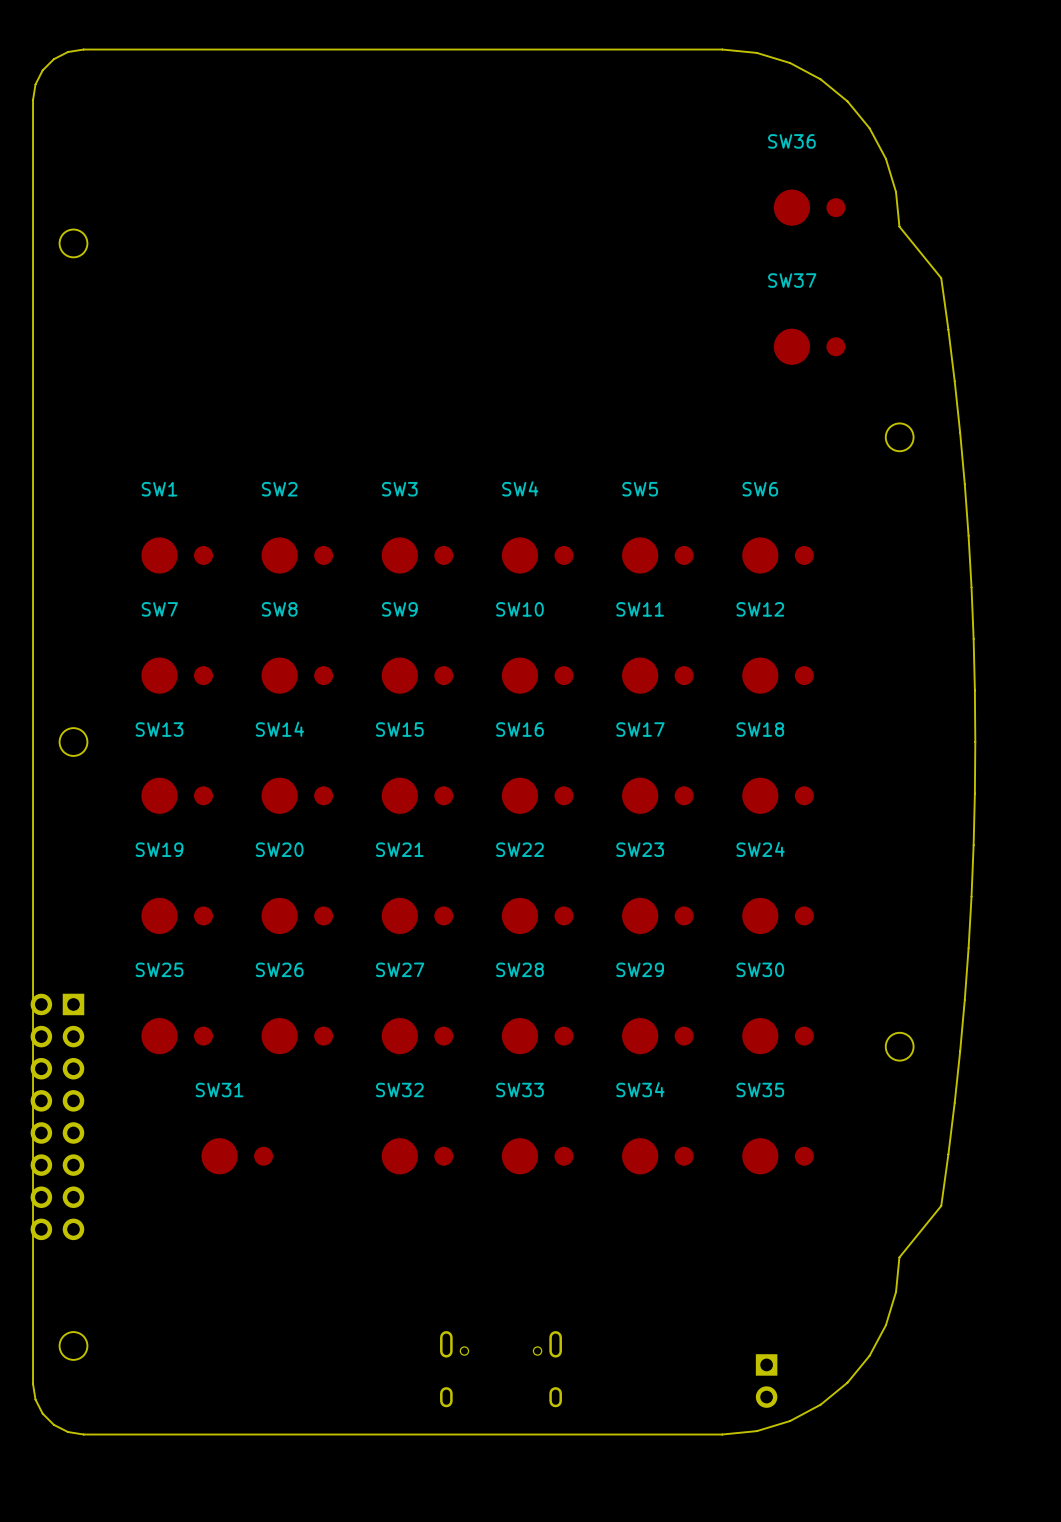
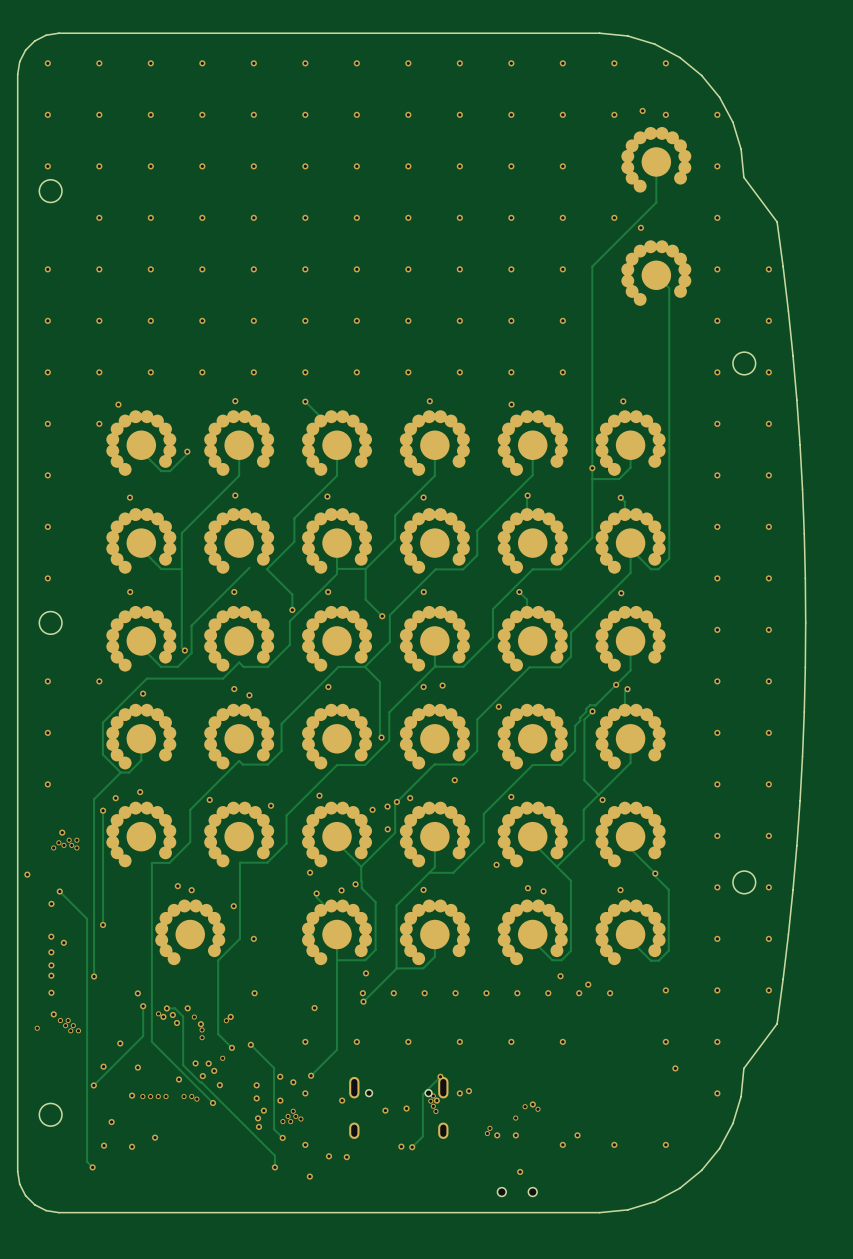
board edge: (722, 49) (756, 52) (790, 63) (820, 79) (847, 101) (869, 128) (885, 158) (896, 192) (899, 226) (941, 278) (948, 329) (964, 484) (973, 638) (974, 793) (968, 948) (960, 1051) (941, 1205) (899, 1257) (896, 1291) (885, 1325) (869, 1355) (847, 1382) (820, 1404) (790, 1421) (756, 1431) (722, 1434) (83, 1434) (67, 1432) (53, 1424) (42, 1413) (35, 1399) (33, 1383) -> (579, 33) (627, 35) (654, 44) (679, 57) (701, 75) (719, 97) (732, 122) (741, 149) (743, 177) (777, 221) (792, 355) (802, 489) (805, 622) (802, 756) (792, 890) (777, 1023) (743, 1068) (741, 1096) (732, 1123) (719, 1148) (701, 1170) (679, 1188) (654, 1201) (627, 1209) (599, 1212) (58, 1212) (46, 1210) (34, 1204) (25, 1195) (19, 1184) (17, 1171) (17, 1119)
via: none -> (47, 63)
via: none -> (99, 63)
via: none -> (150, 63)
via: none -> (202, 63)
via: none -> (253, 63)
via: none -> (305, 63)
via: none -> (356, 63)
via: none -> (408, 63)
via: none -> (459, 63)
via: none -> (511, 63)
via: none -> (562, 63)
via: none -> (614, 63)
via: none -> (665, 63)
via: none -> (642, 110)
via: none -> (47, 114)
via: none -> (99, 114)
via: none -> (150, 114)
via: none -> (202, 114)
via: none -> (253, 114)
via: none -> (305, 114)
via: none -> (356, 114)
via: none -> (408, 114)
via: none -> (459, 114)
via: none -> (511, 114)
via: none -> (562, 114)
via: none -> (614, 114)
via: none -> (665, 114)
via: none -> (717, 114)
part: none -> (656, 159)
SW36: (809, 207) -> none
track: none -> (656, 161) (656, 202) (592, 266) (592, 537) (560, 569) (532, 569) (493, 609) (493, 637) (463, 666) (436, 666) (434, 640)
via: none -> (47, 166)
via: none -> (99, 166)
via: none -> (150, 166)
via: none -> (202, 166)
via: none -> (253, 166)
via: none -> (305, 166)
via: none -> (356, 166)
via: none -> (408, 166)
via: none -> (459, 166)
via: none -> (511, 166)
via: none -> (562, 166)
via: none -> (717, 166)
via: none -> (99, 217)
via: none -> (150, 217)
via: none -> (202, 217)
via: none -> (253, 217)
via: none -> (305, 217)
via: none -> (356, 217)
via: none -> (408, 217)
via: none -> (459, 217)
via: none -> (511, 217)
via: none -> (562, 217)
via: none -> (614, 217)
via: none -> (717, 217)
via: none -> (640, 227)
via: none -> (47, 269)
via: none -> (99, 269)
via: none -> (150, 269)
via: none -> (202, 269)
via: none -> (253, 269)
via: none -> (305, 269)
via: none -> (356, 269)
via: none -> (408, 269)
via: none -> (459, 269)
via: none -> (511, 269)
via: none -> (562, 269)
via: none -> (717, 269)
via: none -> (768, 269)
part: none -> (656, 273)
SW37: (809, 346) -> none
track: none -> (656, 275) (669, 288) (669, 558) (658, 569) (650, 569) (630, 548)
via: none -> (47, 320)
via: none -> (99, 320)
via: none -> (150, 320)
via: none -> (202, 320)
via: none -> (253, 320)
via: none -> (305, 320)
via: none -> (356, 320)
via: none -> (408, 320)
via: none -> (459, 320)
via: none -> (511, 320)
via: none -> (562, 320)
via: none -> (717, 320)
via: none -> (768, 320)
round board edge position: (899, 437) -> (744, 363)
via: none -> (47, 372)
via: none -> (99, 372)
via: none -> (150, 372)
via: none -> (202, 372)
via: none -> (253, 372)
via: none -> (305, 372)
via: none -> (356, 372)
via: none -> (408, 372)
via: none -> (459, 372)
via: none -> (511, 372)
via: none -> (562, 372)
via: none -> (717, 372)
via: none -> (768, 372)
via: none -> (235, 401)
track: none -> (305, 401) (320, 417)
via: none -> (305, 401)
via: none -> (429, 401)
via: none -> (623, 401)
via: none -> (118, 404)
via: none -> (511, 404)
via: none -> (47, 423)
via: none -> (99, 423)
via: none -> (717, 423)
via: none -> (768, 423)
part: none -> (141, 443)
part: none -> (239, 443)
part: none -> (337, 443)
part: none -> (434, 443)
part: none -> (532, 443)
part: none -> (630, 443)
SW1: (177, 555) -> none
track: none -> (141, 445) (141, 451) (161, 471) (170, 471) (187, 451)
SW2: (297, 555) -> none
track: none -> (239, 445) (239, 475) (181, 533) (181, 647) (184, 650)
SW3: (417, 555) -> none
track: none -> (337, 445) (337, 475) (294, 518) (294, 541) (266, 569) (292, 594) (292, 609)
SW4: (537, 555) -> none
track: none -> (434, 445) (434, 475) (395, 515) (395, 539) (365, 568)
SW5: (657, 555) -> none
track: none -> (532, 445) (532, 475) (477, 530) (477, 555) (463, 569) (435, 569) (389, 615) (389, 642) (364, 666)
SW6: (777, 555) -> none
track: none -> (630, 445) (630, 467) (619, 479) (592, 479)
via: none -> (187, 451)
via: none -> (592, 468)
via: none -> (47, 475)
via: none -> (717, 475)
via: none -> (768, 475)
via: none -> (235, 495)
track: none -> (527, 495) (527, 514)
via: none -> (527, 495)
via: none -> (327, 496)
via: none -> (129, 497)
via: none -> (423, 497)
track: none -> (620, 497) (624, 501) (624, 514)
via: none -> (620, 497)
via: none -> (47, 526)
via: none -> (717, 526)
via: none -> (768, 526)
part: none -> (141, 540)
part: none -> (239, 540)
part: none -> (337, 540)
part: none -> (434, 540)
part: none -> (532, 540)
part: none -> (630, 540)
SW7: (177, 675) -> none
track: none -> (141, 543) (141, 548) (161, 569) (181, 569)
SW8: (297, 675) -> none
SW9: (417, 675) -> none
track: none -> (337, 543) (337, 574) (289, 621) (289, 644) (267, 666) (243, 666) (239, 662) (223, 678) (146, 678) (102, 722) (102, 754) (120, 772)
SW10: (537, 675) -> none
SW11: (657, 675) -> none
SW12: (777, 675) -> none
track: none -> (630, 543) (630, 573) (571, 632) (571, 656) (560, 667) (529, 667) (477, 719) (477, 750) (463, 764) (434, 764) (395, 803) (395, 832) (361, 866)
track: none -> (249, 567) (191, 625) (191, 653) (177, 666) (161, 666) (141, 647) (141, 640)
track: none -> (337, 568) (365, 568)
track: none -> (365, 568) (365, 599) (382, 616)
via: none -> (47, 578)
via: none -> (717, 578)
via: none -> (768, 578)
via: none -> (130, 592)
via: none -> (234, 592)
via: none -> (328, 592)
via: none -> (423, 592)
track: none -> (519, 592) (527, 599) (527, 612)
via: none -> (519, 592)
via: none -> (621, 593)
round board edge position: (73, 742) -> (50, 622)
via: none -> (292, 609)
via: none -> (382, 616)
via: none -> (717, 629)
via: none -> (768, 629)
part: none -> (141, 638)
part: none -> (239, 638)
part: none -> (337, 638)
part: none -> (434, 638)
part: none -> (532, 638)
part: none -> (630, 638)
SW13: (177, 795) -> none
SW14: (297, 795) -> none
SW15: (417, 795) -> none
SW16: (537, 795) -> none
SW17: (657, 795) -> none
SW18: (777, 795) -> none
track: none -> (630, 640) (630, 670) (595, 705) (589, 705) (586, 708) (586, 711) (575, 725) (575, 750) (561, 765) (532, 765) (483, 813) (483, 842) (453, 872) (429, 872)
via: none -> (184, 650)
track: none -> (435, 666) (389, 712) (389, 740) (365, 765) (337, 765) (286, 815) (286, 843) (267, 862) (239, 862) (239, 938) (218, 960) (218, 1034) (231, 1047)
track: none -> (364, 666) (338, 666) (281, 723) (281, 750) (267, 764) (242, 764) (239, 760) (190, 809) (190, 842) (169, 862) (151, 862) (151, 1041) (213, 1102)
track: none -> (364, 666) (379, 681) (379, 735) (381, 737)
via: none -> (47, 681)
via: none -> (99, 681)
via: none -> (717, 681)
via: none -> (768, 681)
via: none -> (616, 684)
via: none -> (442, 685)
via: none -> (328, 686)
via: none -> (423, 686)
via: none -> (234, 689)
track: none -> (627, 689) (624, 691) (624, 710)
via: none -> (627, 689)
via: none -> (143, 693)
via: none -> (249, 695)
via: none -> (498, 706)
track: none -> (592, 711) (584, 719) (584, 780) (598, 794)
via: none -> (592, 711)
via: none -> (47, 732)
via: none -> (717, 732)
via: none -> (768, 732)
part: none -> (141, 736)
part: none -> (239, 736)
part: none -> (337, 736)
part: none -> (434, 736)
part: none -> (532, 736)
part: none -> (630, 736)
via: none -> (381, 737)
SW19: (177, 915) -> none
track: none -> (141, 738) (141, 760) (129, 772) (120, 772)
SW20: (297, 915) -> none
SW21: (417, 915) -> none
SW22: (537, 915) -> none
SW23: (657, 915) -> none
SW24: (777, 915) -> none
track: none -> (630, 738) (630, 762) (583, 809) (583, 839) (556, 866)
track: none -> (120, 772) (94, 799) (94, 976)
via: none -> (454, 780)
via: none -> (47, 784)
via: none -> (717, 784)
via: none -> (768, 784)
via: none -> (140, 792)
via: none -> (319, 795)
via: none -> (511, 797)
via: none -> (115, 798)
via: none -> (410, 798)
via: none -> (209, 799)
via: none -> (602, 799)
via: none -> (396, 801)
via: none -> (270, 805)
via: none -> (387, 806)
via: none -> (372, 809)
track: none -> (103, 810) (103, 924)
via: none -> (103, 810)
via: none -> (387, 829)
via: none -> (62, 832)
part: none -> (141, 834)
part: none -> (239, 834)
part: none -> (337, 834)
part: none -> (434, 834)
part: none -> (532, 834)
part: none -> (630, 834)
via: none -> (717, 835)
via: none -> (768, 835)
SW25: (177, 1036) -> none
SW26: (297, 1036) -> none
SW27: (417, 1036) -> none
track: none -> (337, 836) (337, 842) (361, 866)
SW28: (537, 1036) -> none
track: none -> (434, 836) (434, 867) (396, 905) (396, 968) (363, 1001)
SW29: (657, 1036) -> none
track: none -> (532, 836) (532, 842) (570, 880) (570, 950) (561, 960) (552, 960) (532, 940) (532, 934)
SW30: (777, 1036) -> none
track: none -> (630, 836) (630, 848) (668, 889) (668, 950) (658, 960) (650, 960) (630, 940) (630, 934)
via: none -> (69, 840)
via: none -> (76, 840)
via: none -> (58, 842)
via: none -> (64, 845)
via: none -> (71, 845)
round board edge position: (899, 1046) -> (744, 882)
via: none -> (53, 847)
via: none -> (76, 847)
via: none -> (496, 864)
track: none -> (361, 866) (361, 888) (375, 902) (375, 949) (365, 960) (337, 960)
via: none -> (310, 872)
via: none -> (655, 873)
via: none -> (27, 874)
via: none -> (355, 884)
via: none -> (177, 886)
via: none -> (717, 887)
via: none -> (768, 887)
via: none -> (527, 888)
via: none -> (191, 890)
via: none -> (423, 889)
via: none -> (620, 890)
via: none -> (341, 890)
track: none -> (59, 891) (87, 918) (87, 1161) (92, 1167)
via: none -> (59, 891)
via: none -> (543, 891)
track: none -> (316, 893) (316, 897) (325, 905)
via: none -> (316, 893)
part: (57, 1116) -> none
via: none -> (51, 903)
via: none -> (233, 906)
via: none -> (103, 924)
part: none -> (190, 932)
part: none -> (337, 932)
part: none -> (434, 932)
part: none -> (532, 932)
part: none -> (630, 932)
SW31: (237, 1156) -> none
SW32: (417, 1156) -> none
track: none -> (337, 934) (337, 1049) (311, 1075)
SW33: (537, 1156) -> none
track: none -> (434, 934) (434, 956) (423, 968) (396, 968)
SW34: (657, 1156) -> none
SW35: (777, 1156) -> none
via: none -> (51, 936)
via: none -> (253, 938)
via: none -> (717, 938)
via: none -> (768, 938)
via: none -> (63, 942)
via: none -> (51, 952)
via: none -> (51, 965)
via: none -> (366, 973)
via: none -> (51, 975)
via: none -> (94, 976)
via: none -> (560, 976)
via: none -> (588, 984)
via: none -> (665, 990)
via: none -> (717, 990)
via: none -> (768, 990)
via: none -> (51, 992)
via: none -> (137, 993)
via: none -> (254, 993)
via: none -> (362, 993)
via: none -> (393, 993)
via: none -> (424, 993)
via: none -> (455, 993)
via: none -> (486, 993)
via: none -> (517, 993)
via: none -> (548, 993)
via: none -> (579, 993)
via: none -> (610, 993)
via: none -> (363, 1001)
track: none -> (143, 1006) (143, 1036) (93, 1085)
via: none -> (143, 1006)
via: none -> (187, 1008)
via: none -> (314, 1008)
track: none -> (166, 1008) (175, 1008) (183, 1016) (183, 1065) (274, 1155) (274, 1167)
via: none -> (166, 1008)
via: none -> (158, 1013)
via: none -> (53, 1014)
via: none -> (172, 1015)
via: none -> (163, 1016)
via: none -> (194, 1017)
via: none -> (230, 1016)
via: none -> (60, 1020)
via: none -> (68, 1020)
via: none -> (226, 1020)
via: none -> (176, 1022)
via: none -> (200, 1024)
via: none -> (65, 1025)
via: none -> (73, 1025)
via: none -> (37, 1028)
via: none -> (202, 1029)
via: none -> (70, 1030)
via: none -> (78, 1030)
via: none -> (202, 1037)
via: none -> (305, 1041)
via: none -> (356, 1041)
via: none -> (408, 1041)
via: none -> (459, 1041)
via: none -> (511, 1041)
via: none -> (562, 1041)
via: none -> (665, 1041)
via: none -> (717, 1041)
via: none -> (120, 1043)
track: none -> (250, 1044) (274, 1068) (274, 1129) (282, 1137)
via: none -> (250, 1044)
via: none -> (231, 1047)
via: none -> (222, 1058)
via: none -> (195, 1063)
via: none -> (208, 1063)
via: none -> (103, 1066)
via: none -> (137, 1067)
via: none -> (675, 1068)
via: none -> (214, 1070)
via: none -> (311, 1075)
via: none -> (202, 1076)
via: none -> (280, 1076)
track: none -> (440, 1076) (422, 1094) (422, 1136) (412, 1147)
via: none -> (440, 1076)
via: none -> (179, 1079)
via: none -> (293, 1082)
via: none -> (93, 1085)
via: none -> (219, 1085)
via: none -> (256, 1085)
round board edge position: (73, 1345) -> (50, 1114)
via: none -> (468, 1091)
via: none -> (305, 1093)
via: none -> (459, 1093)
via: none -> (717, 1093)
via: none -> (132, 1095)
via: none -> (433, 1095)
via: none -> (142, 1096)
via: none -> (150, 1096)
via: none -> (158, 1096)
via: none -> (166, 1096)
via: none -> (184, 1096)
via: none -> (191, 1096)
via: none -> (256, 1098)
via: none -> (196, 1099)
via: none -> (280, 1100)
via: none -> (342, 1100)
via: none -> (430, 1101)
via: none -> (436, 1100)
via: none -> (213, 1102)
via: none -> (532, 1104)
via: none -> (433, 1106)
via: none -> (525, 1106)
via: none -> (406, 1108)
via: none -> (537, 1109)
via: none -> (263, 1110)
via: none -> (385, 1110)
via: none -> (293, 1111)
via: none -> (435, 1111)
via: none -> (288, 1116)
via: none -> (295, 1116)
via: none -> (258, 1118)
via: none -> (515, 1118)
part: (766, 1381) -> none
via: none -> (300, 1119)
via: none -> (282, 1121)
via: none -> (290, 1121)
via: none -> (111, 1122)
via: none -> (259, 1126)
via: none -> (489, 1128)
via: none -> (487, 1133)
via: none -> (497, 1135)
via: none -> (515, 1135)
via: none -> (577, 1135)
via: none -> (155, 1137)
via: none -> (282, 1137)
via: none -> (305, 1144)
via: none -> (562, 1144)
via: none -> (614, 1144)
via: none -> (665, 1144)
via: none -> (104, 1145)
via: none -> (132, 1146)
via: none -> (401, 1146)
via: none -> (412, 1147)
via: none -> (329, 1156)
via: none -> (346, 1157)
via: none -> (92, 1167)
via: none -> (274, 1167)
via: none -> (520, 1171)
via: none -> (309, 1176)
part: none -> (517, 1192)

